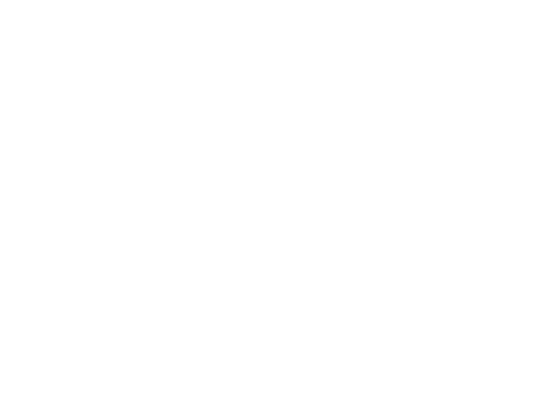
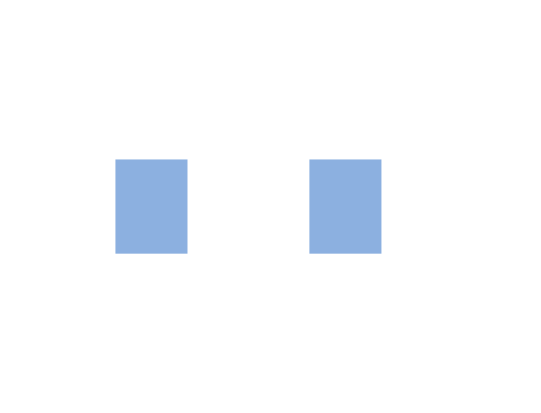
part: none -> (248, 206)

